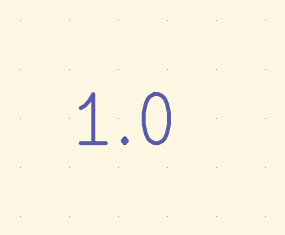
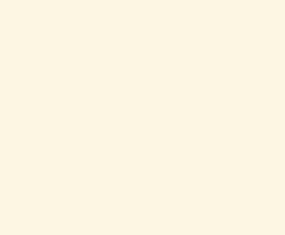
text: 1.0 (124, 118) -> none

